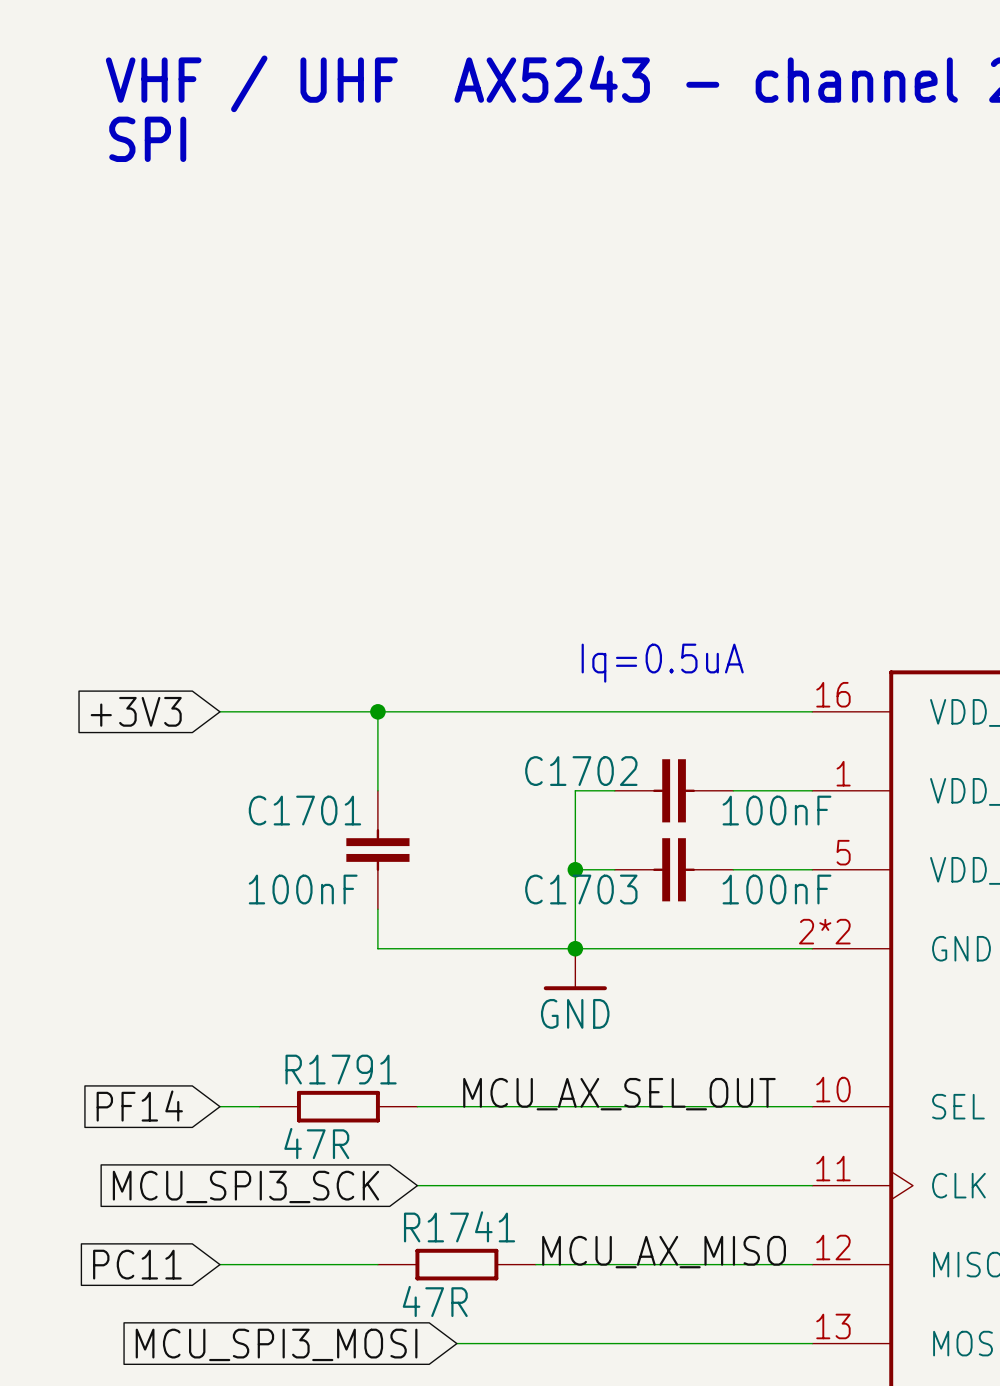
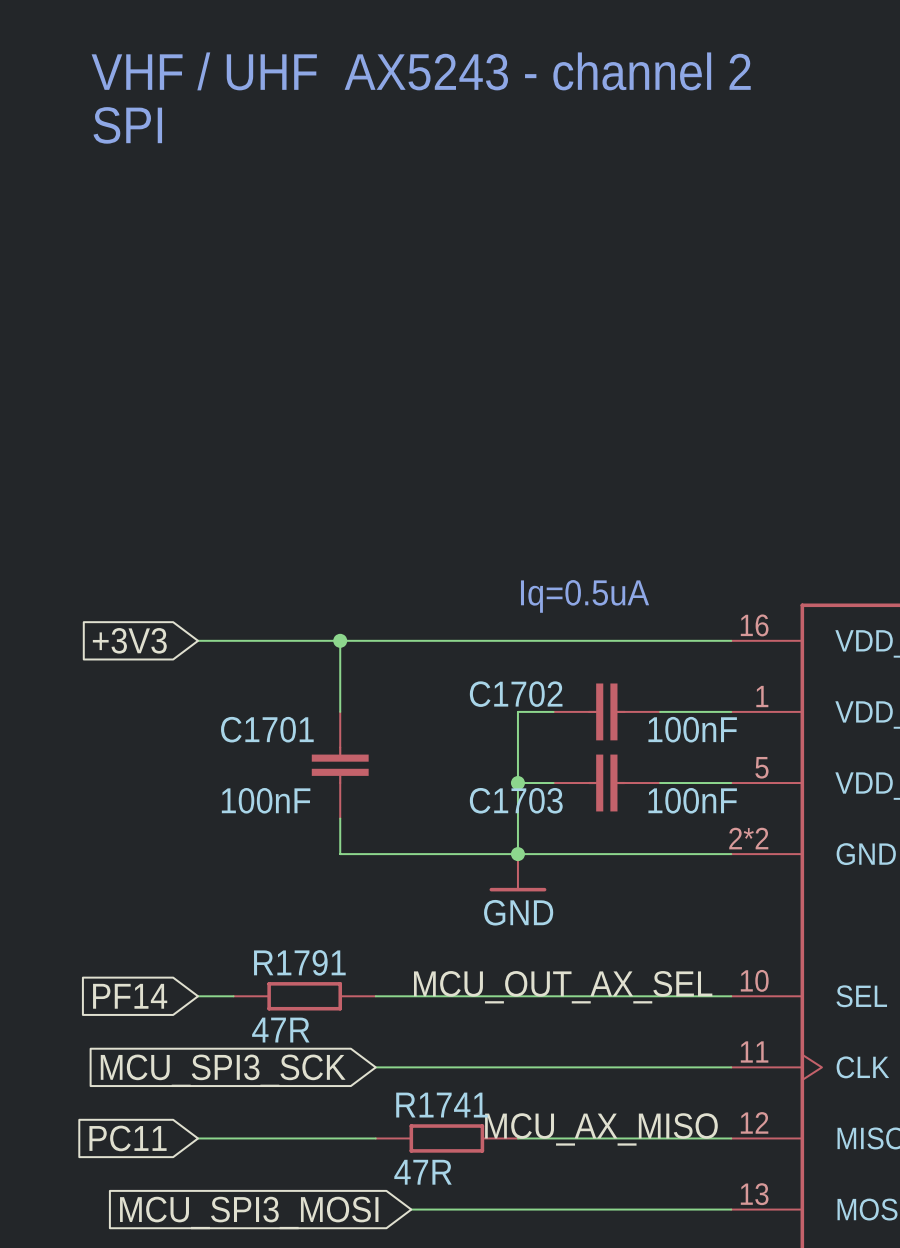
label: MCU_AX_SEL_OUT (619, 1094) -> MCU_OUT_AX_SEL (563, 987)
R1741 position: (456, 1264) -> (446, 1138)

